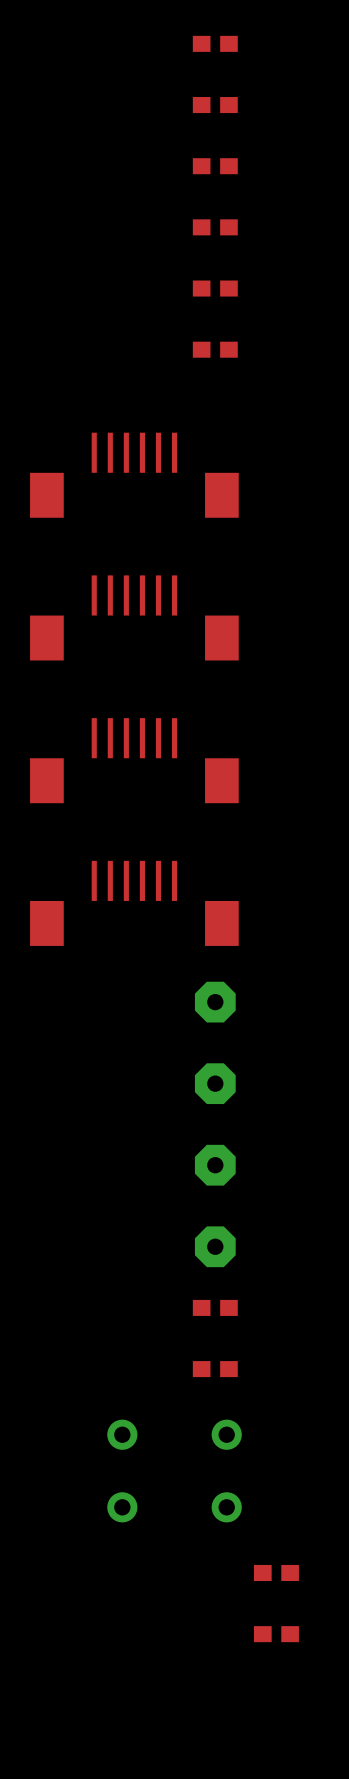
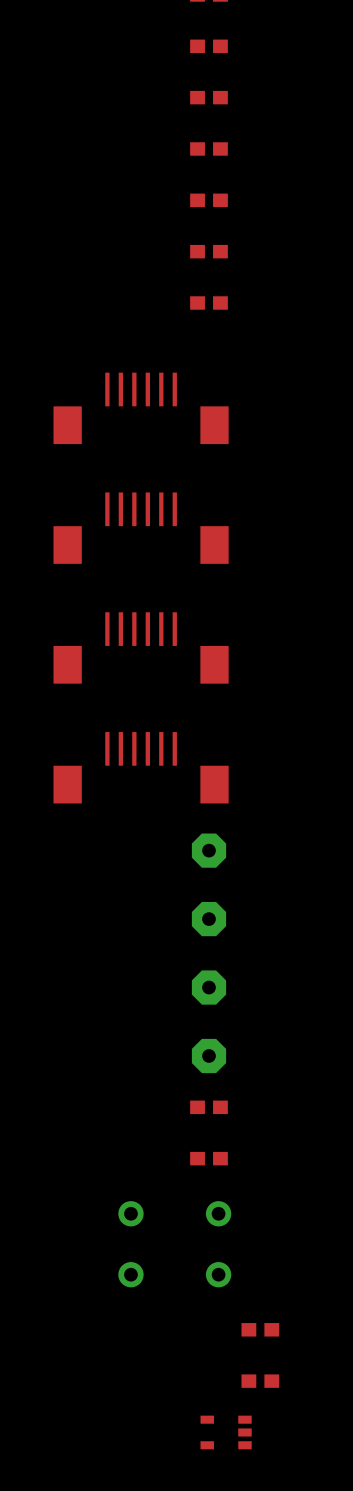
part: none -> (226, 1432)

